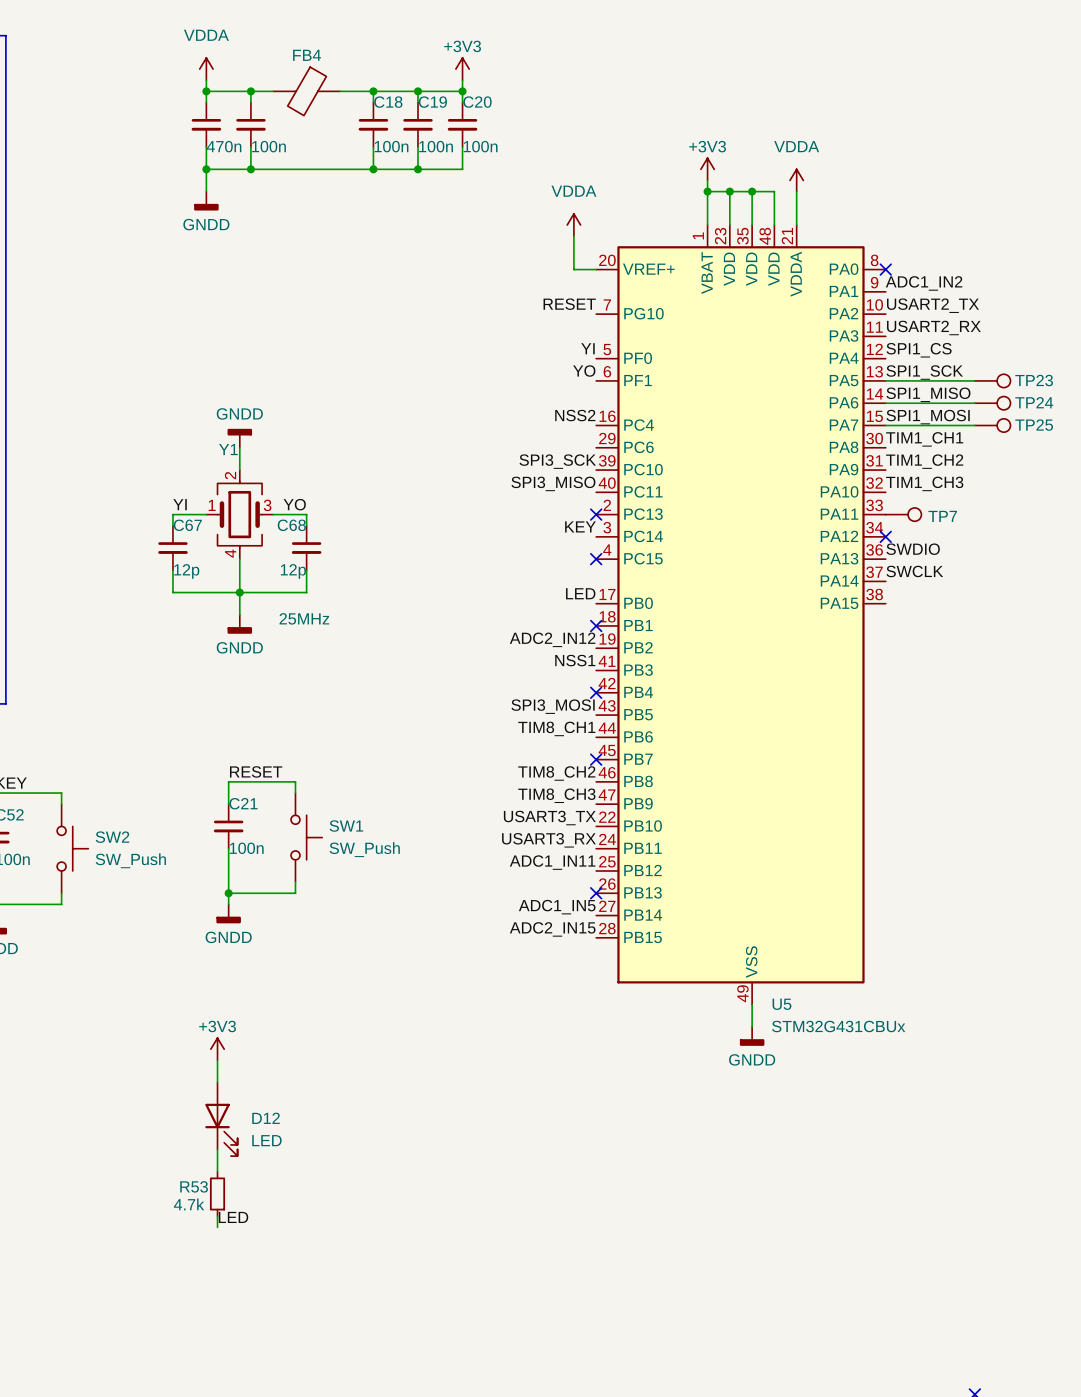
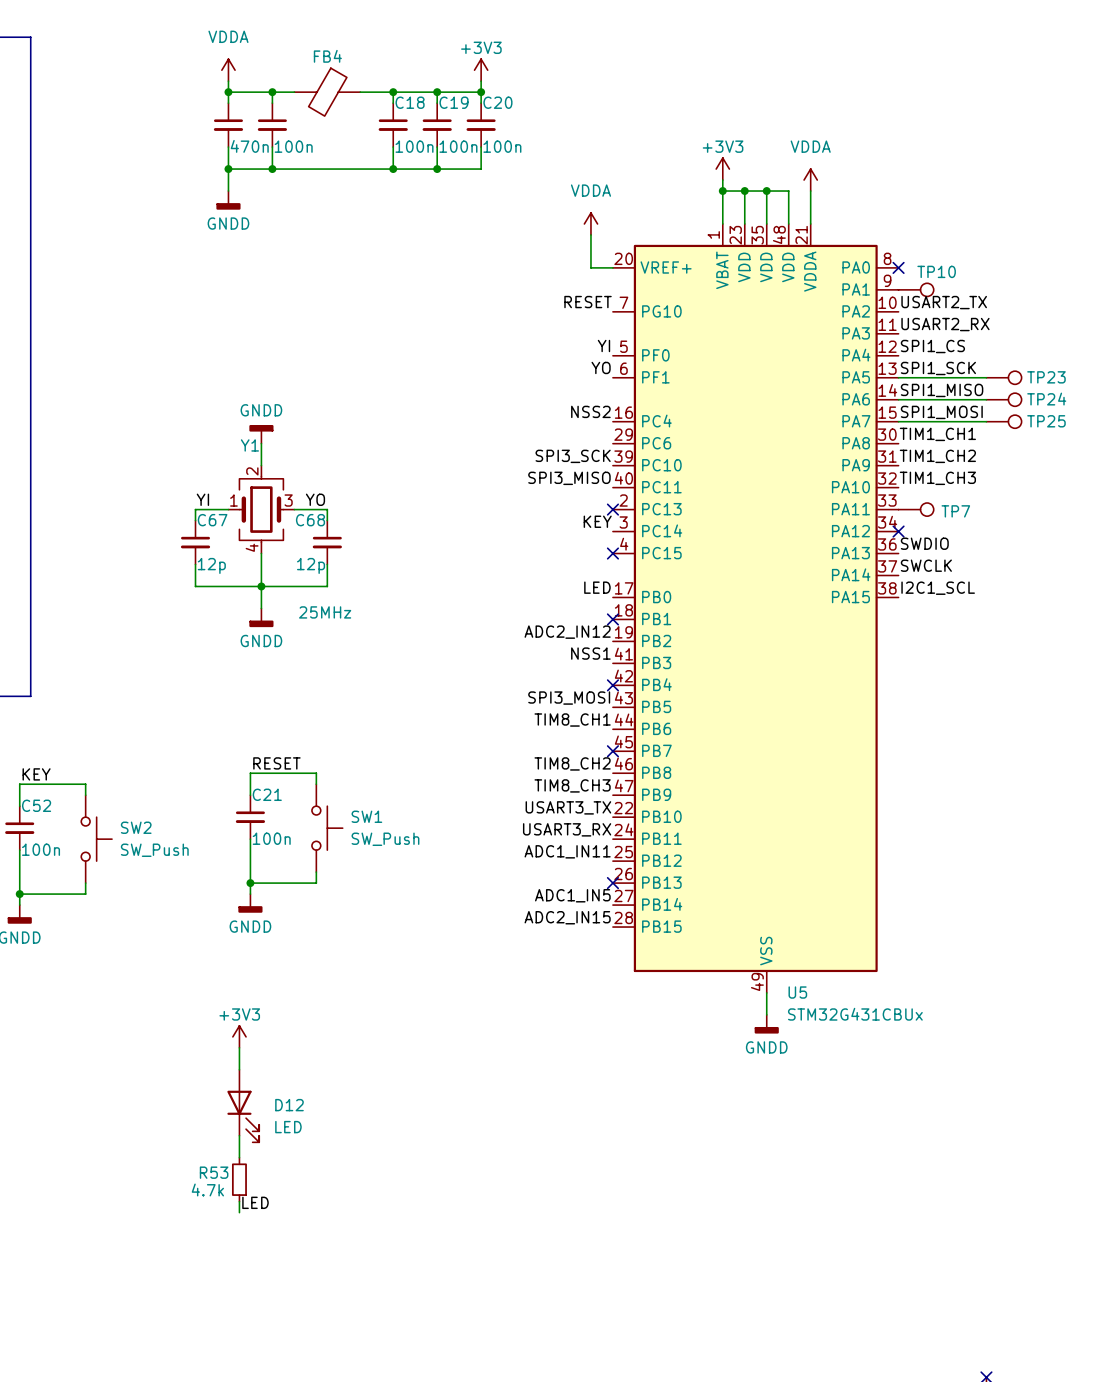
label: ADC1_IN2 (924, 283) -> none
TP10: none -> (916, 289)
label: none -> I2C1_SCL (938, 588)

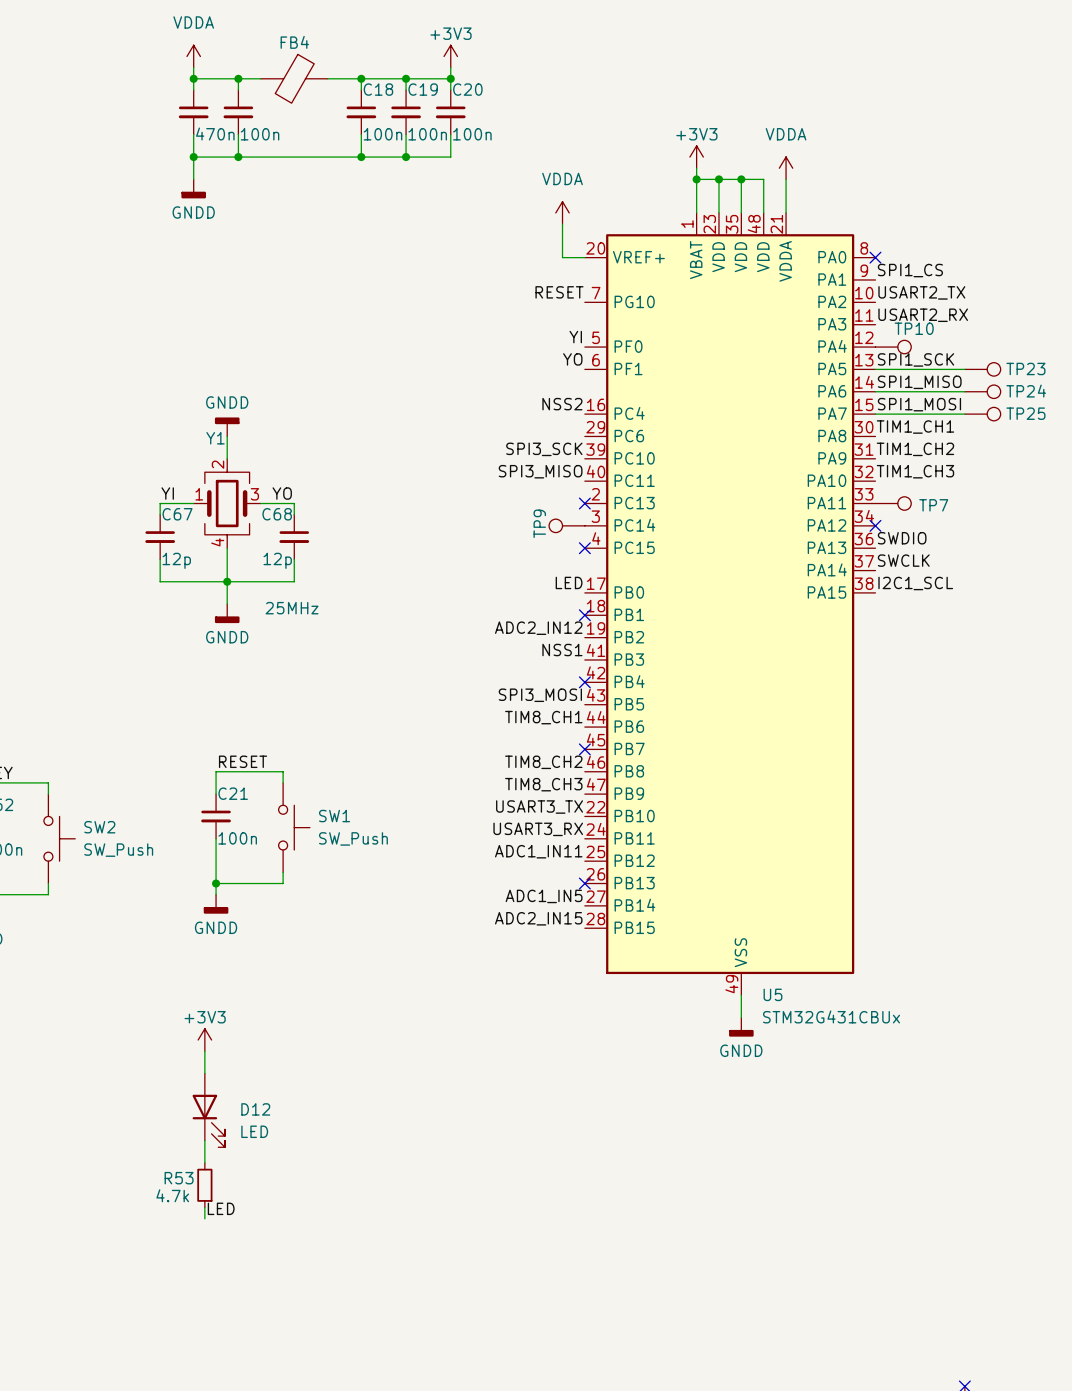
TP10 position: (916, 289) -> (893, 347)
label position: SPI1_CS (932, 346) -> SPI1_CS (910, 270)
label: KEY (597, 521) -> none
TP9: none -> (566, 525)

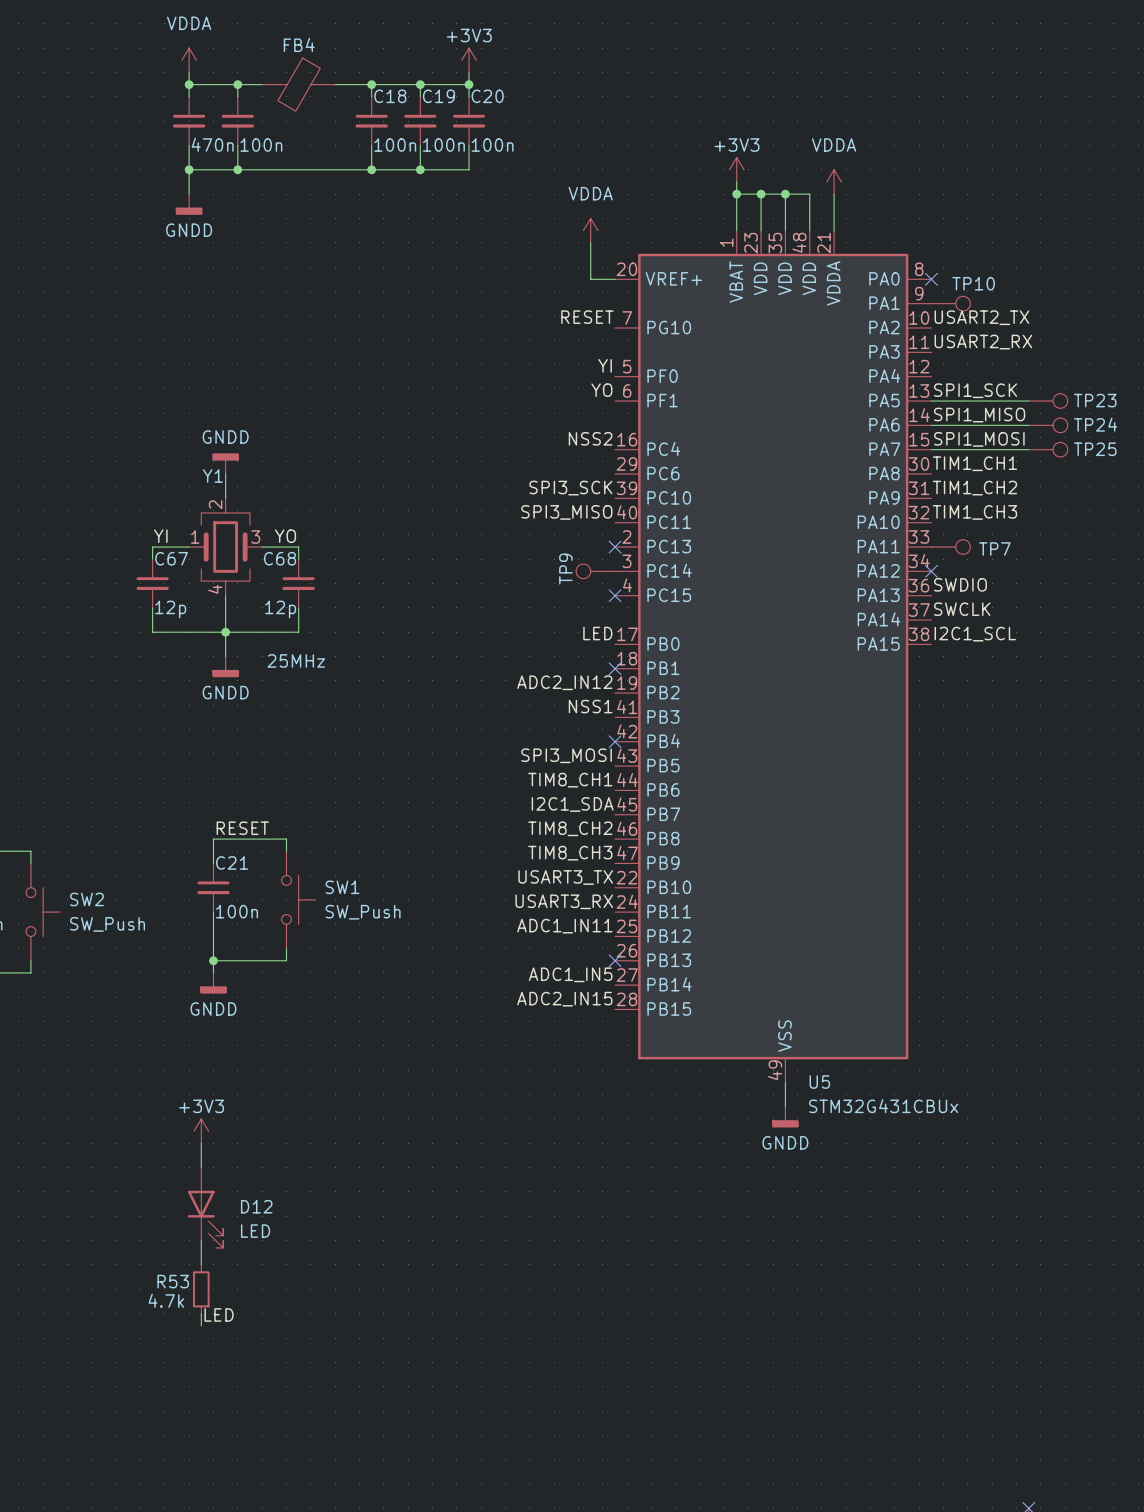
label: SPI1_CS (910, 270) -> none
TP10 position: (893, 347) -> (950, 303)
label: none -> I2C1_SDA (572, 804)
no-connect mark: (584, 749) -> none

